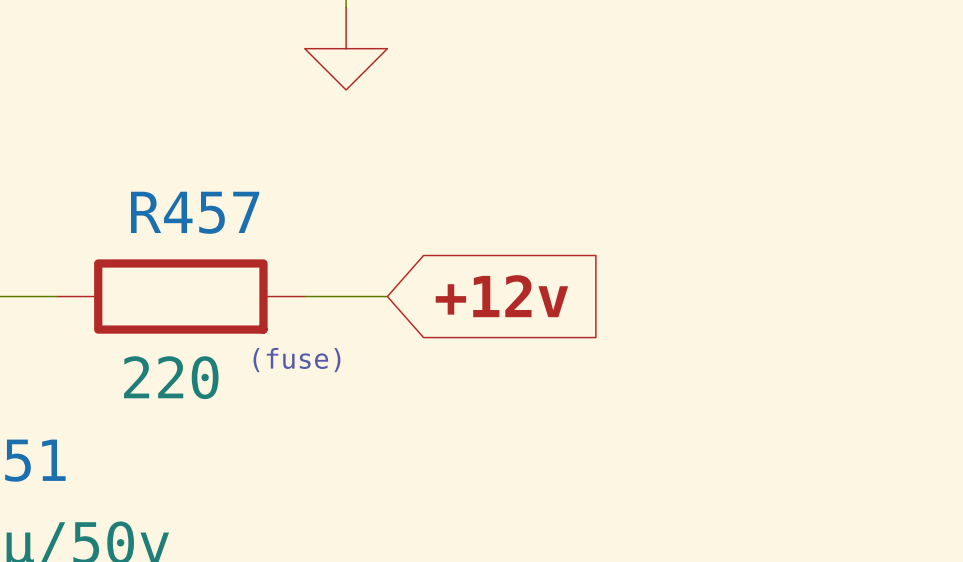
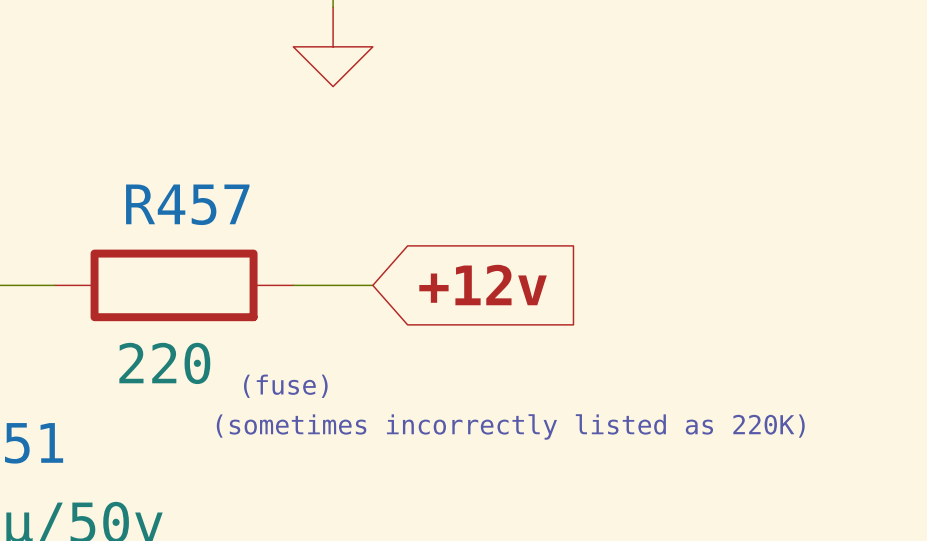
text position: (fuse) (296, 360) -> (fuse) (285, 386)
text: none -> (sometimes incorrectly listed as 220K) (510, 426)

